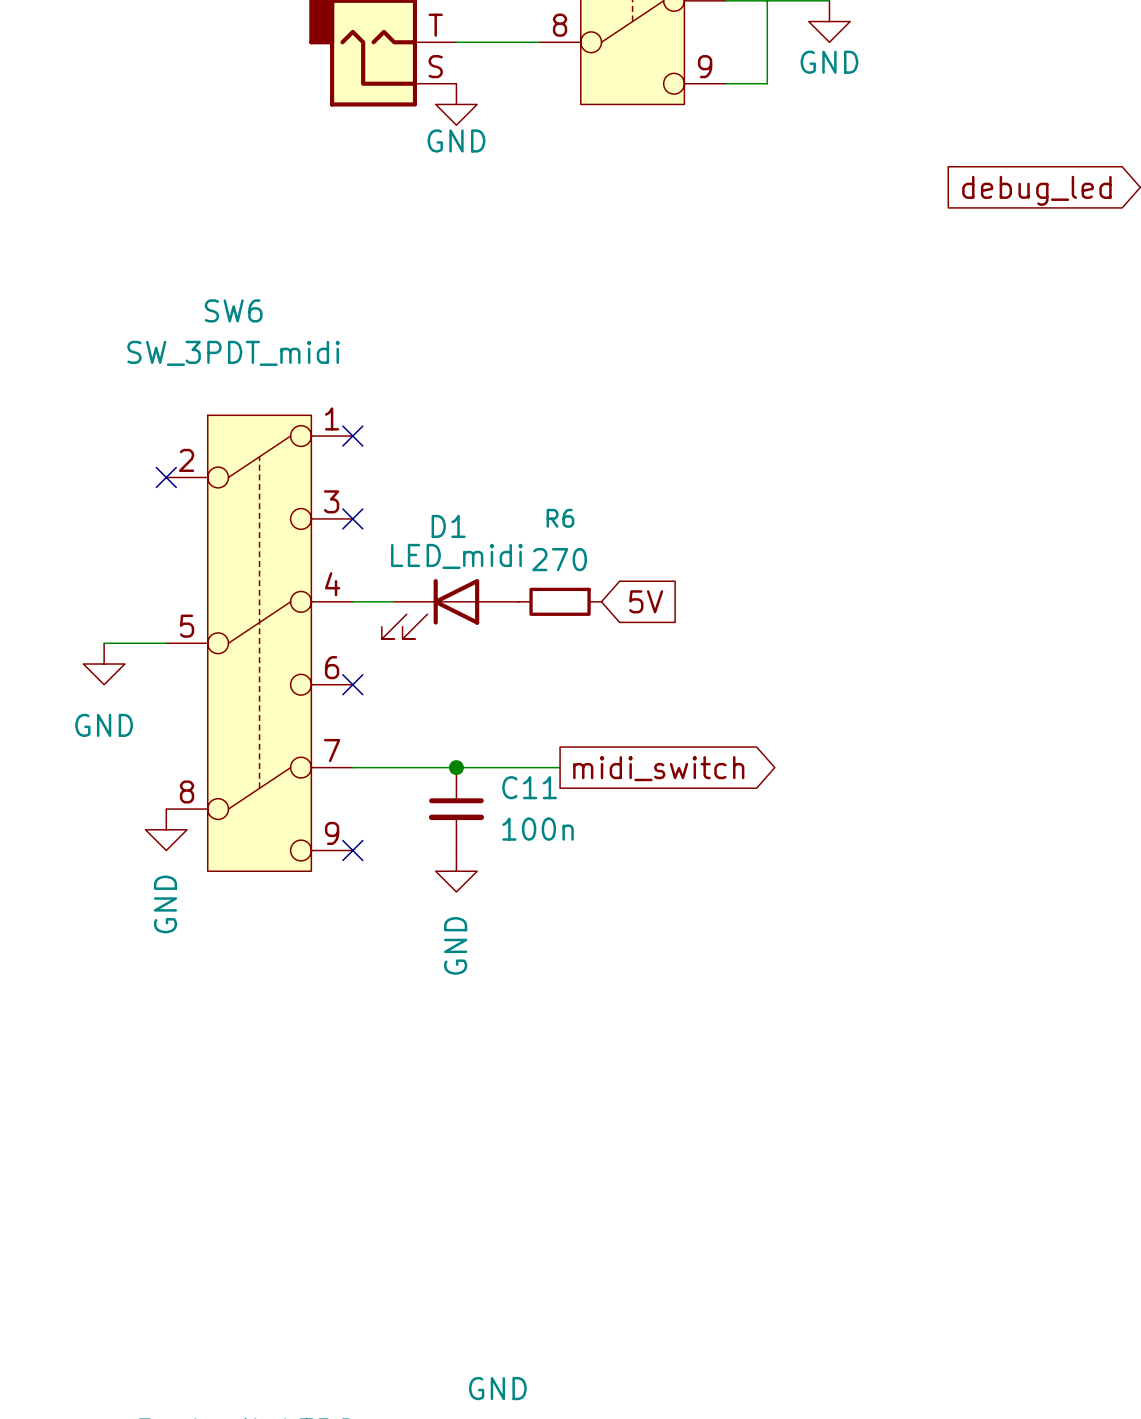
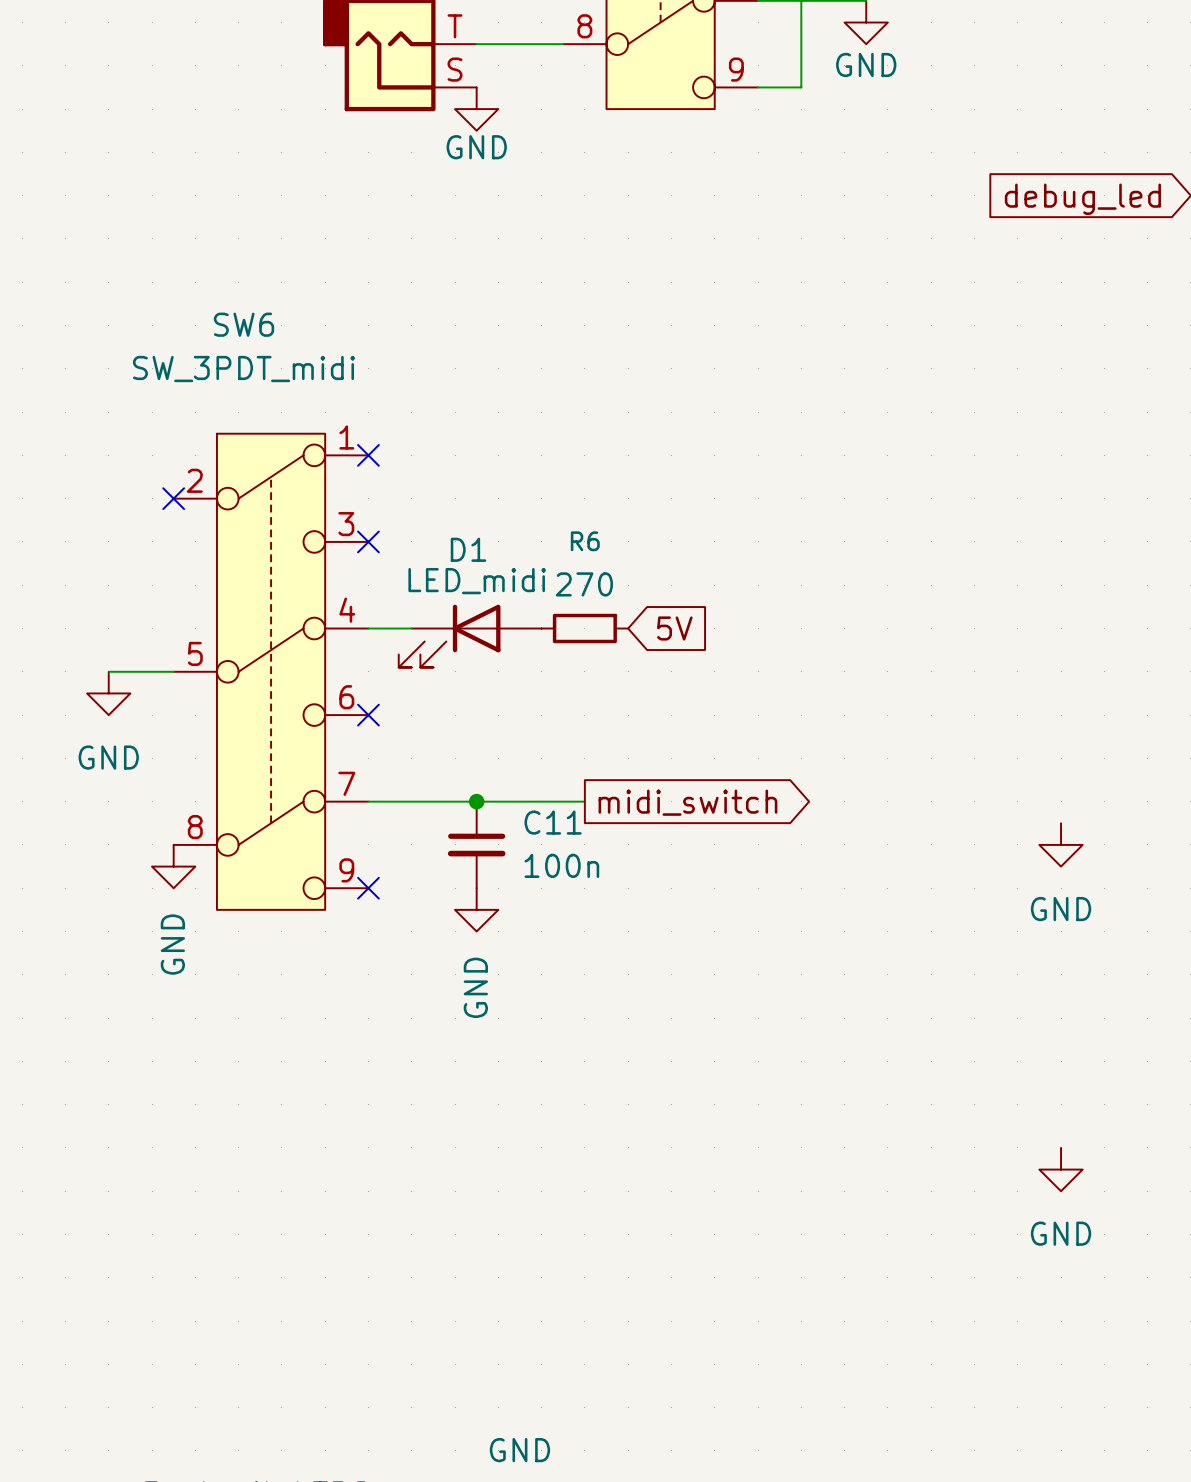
power symbol: none -> GND (1061, 844)
power symbol: none -> GND (1061, 1169)

